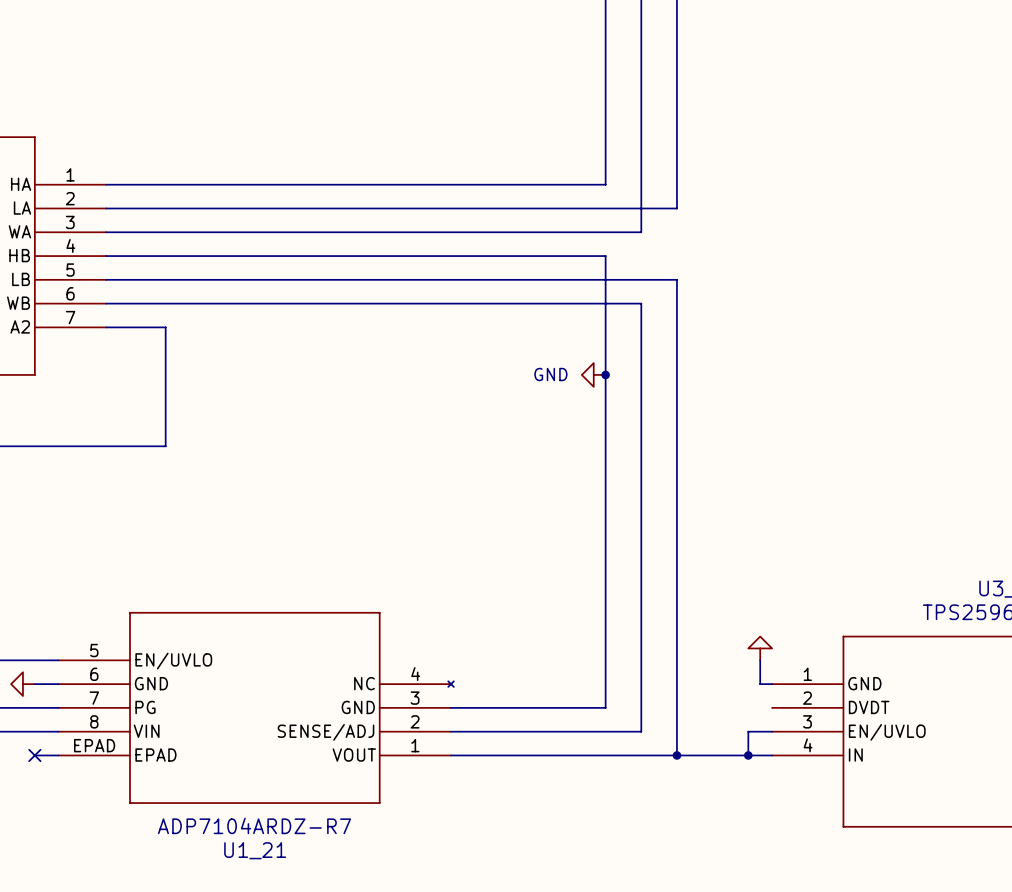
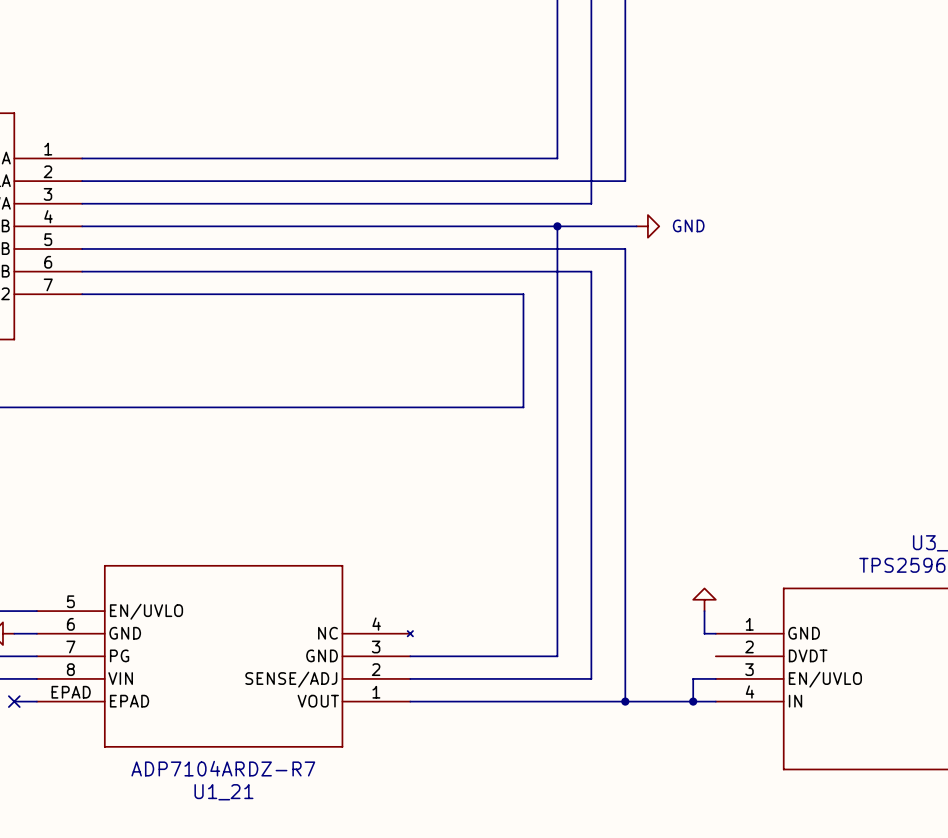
wire: none -> (557, 226) (636, 226)
junction: none -> (557, 226)
wire: (165, 327) (165, 446) -> (138, 294) (523, 294) (523, 407) (138, 407)
power symbol rotation: 0° (593, 374) -> 180° (647, 226)
power symbol position: GND (593, 374) -> GND (647, 226)
junction: (605, 374) -> none

